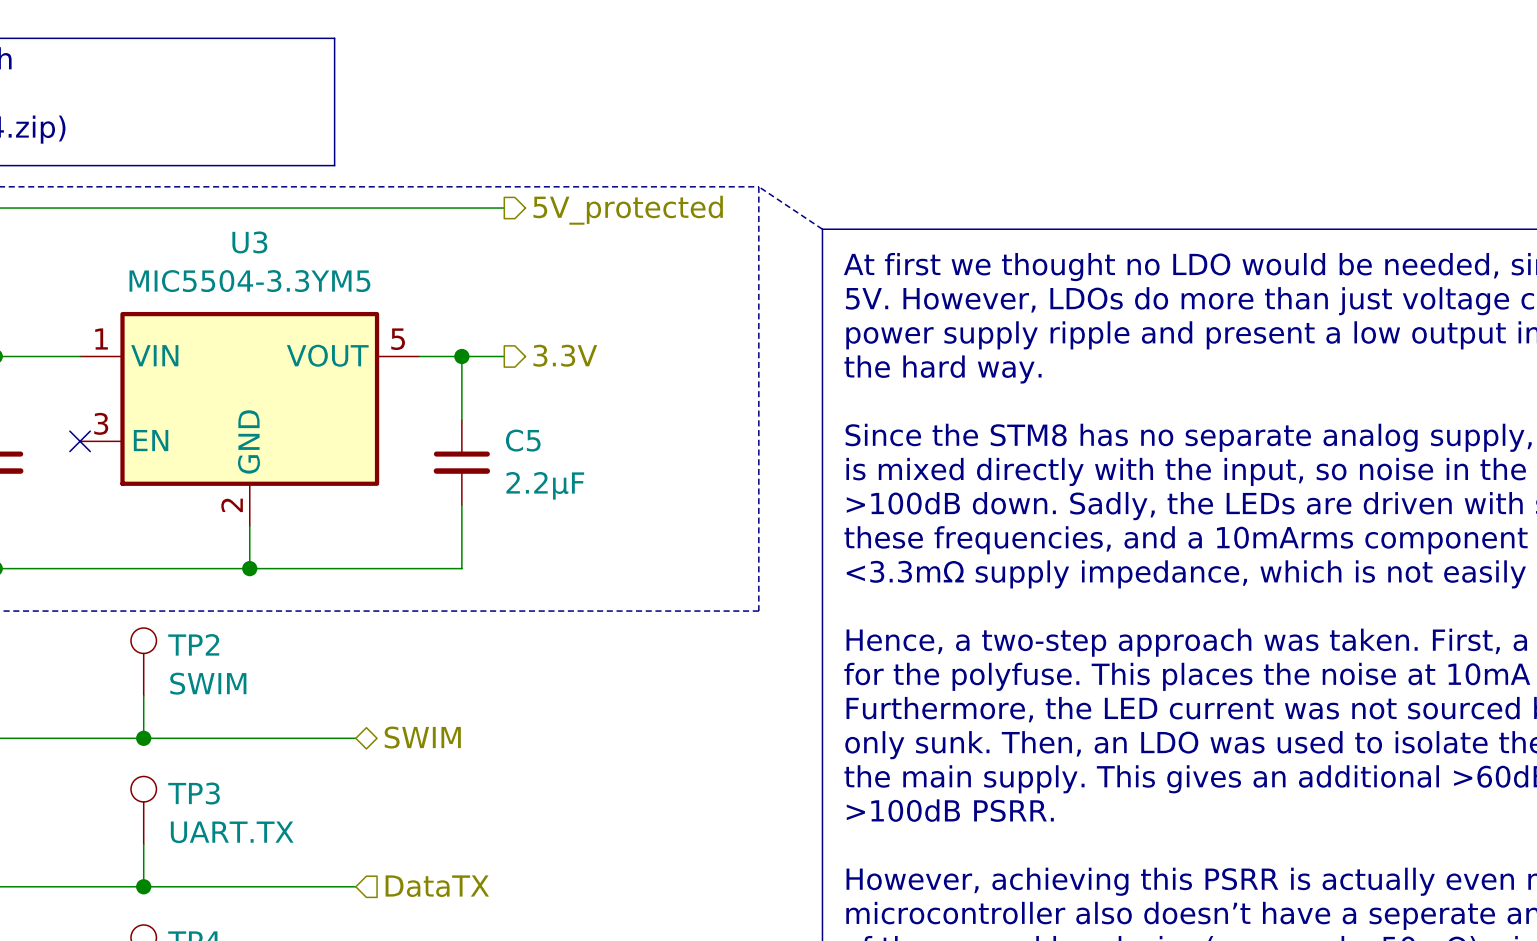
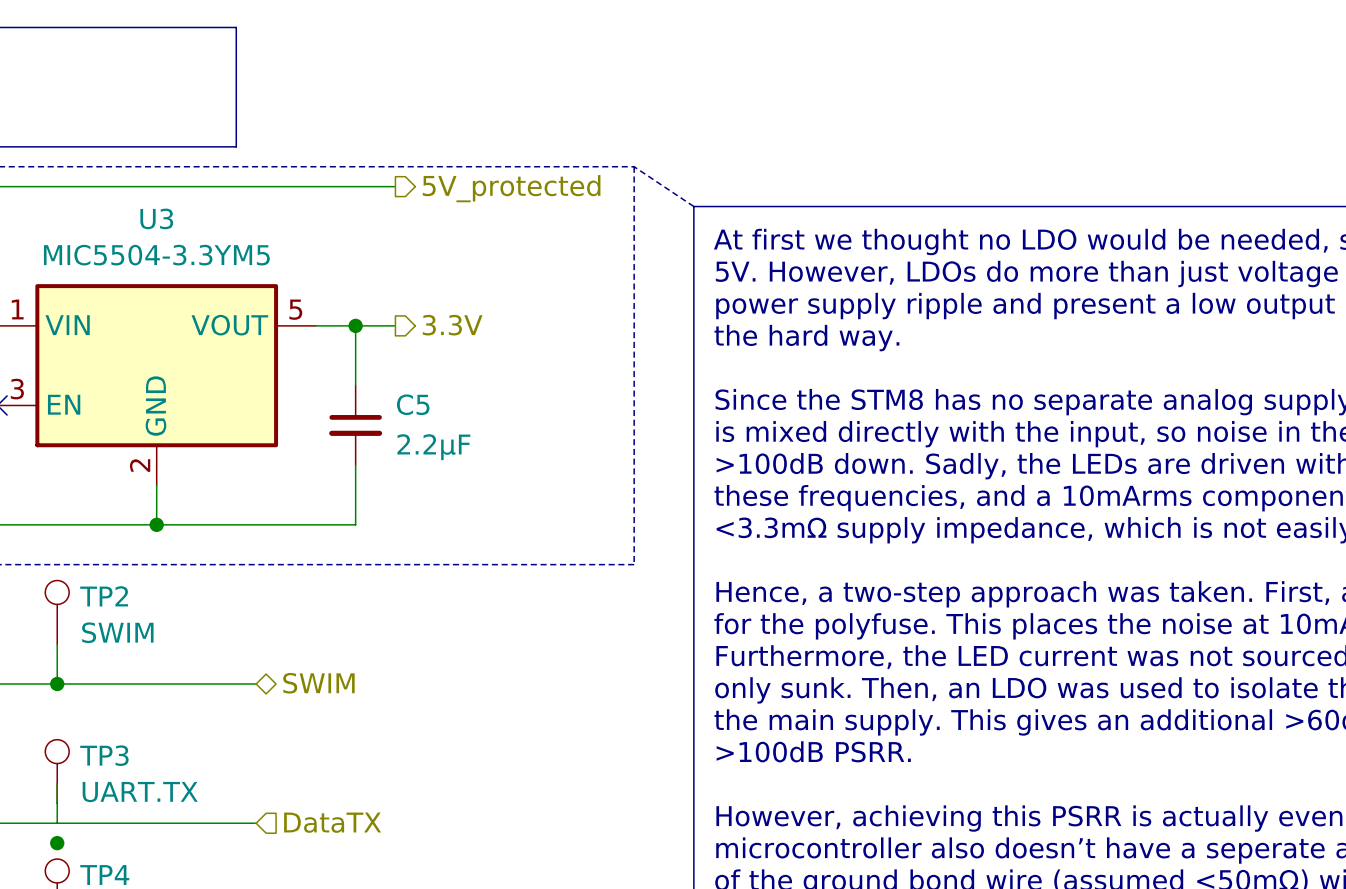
TP3 position: (143, 810) -> (57, 771)
junction position: (143, 886) -> (57, 843)

